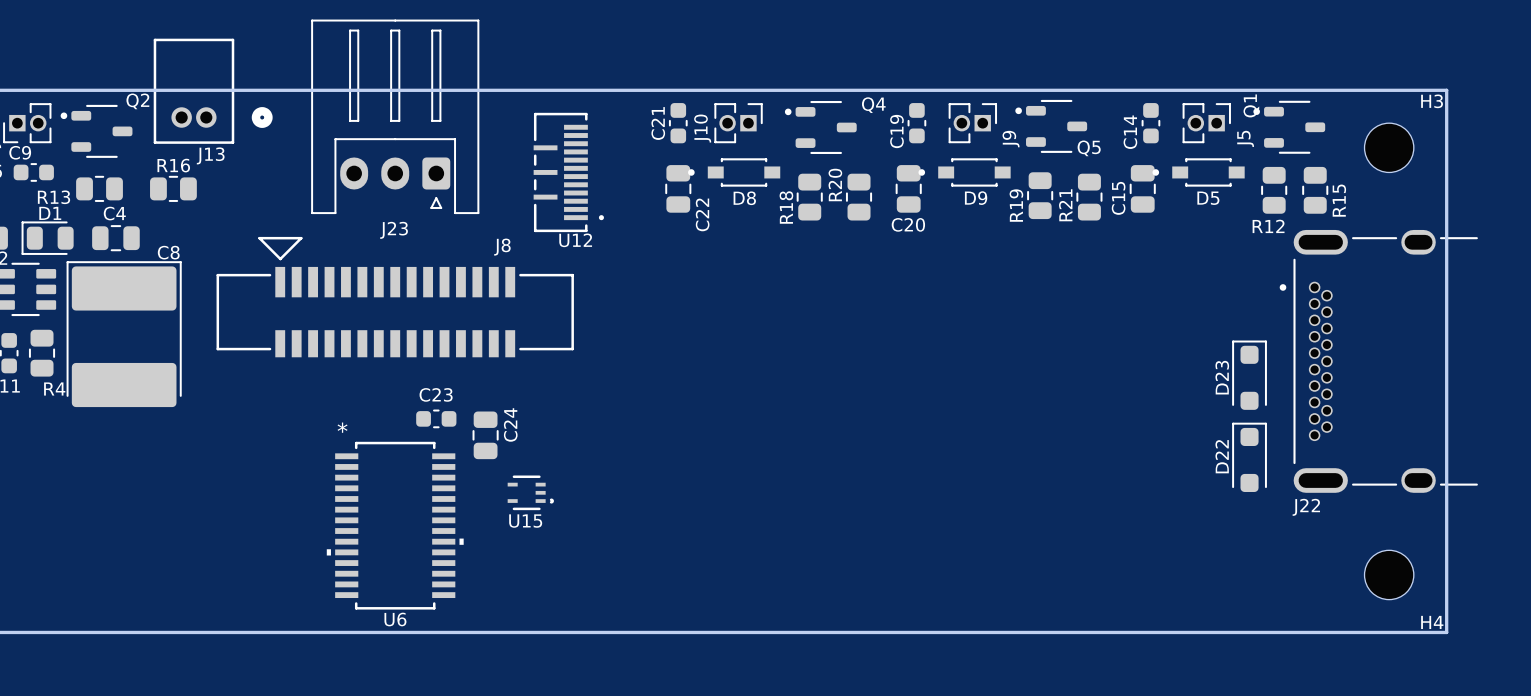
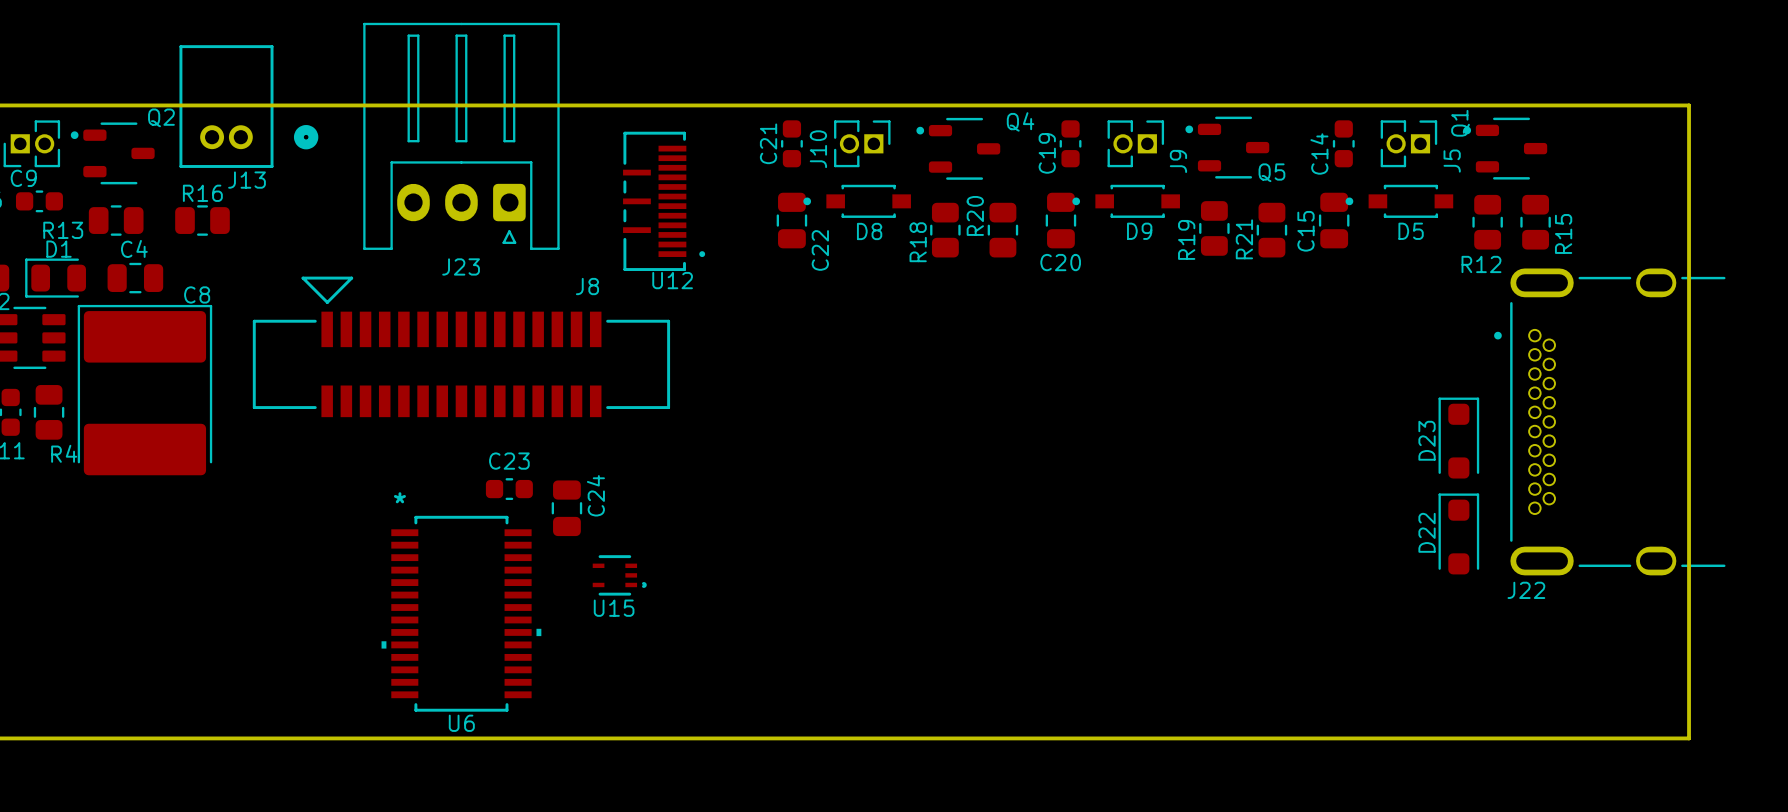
H3: (1389, 147) -> none
H4: (1389, 574) -> none

